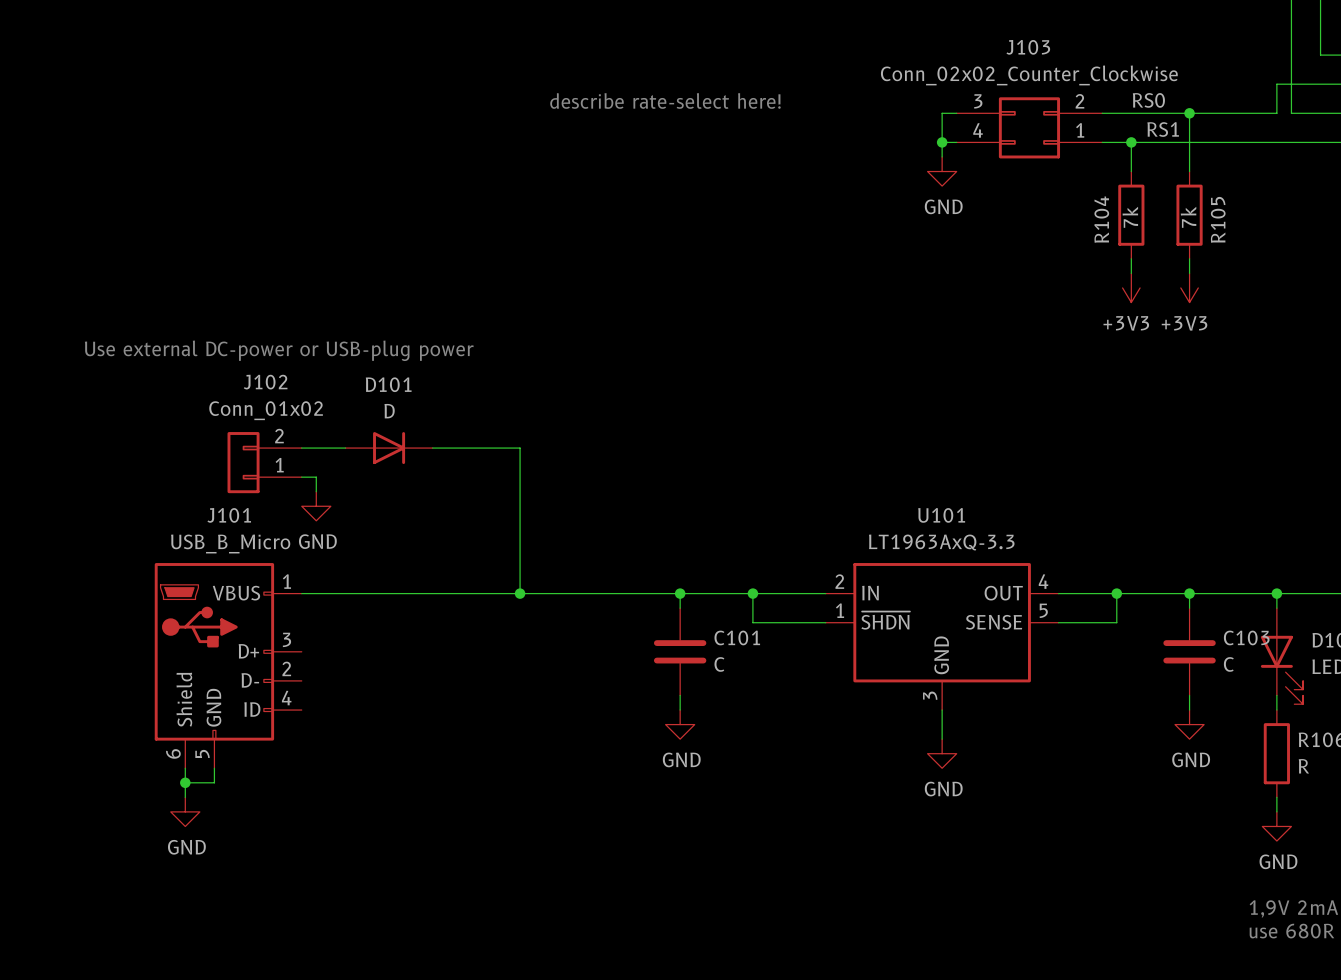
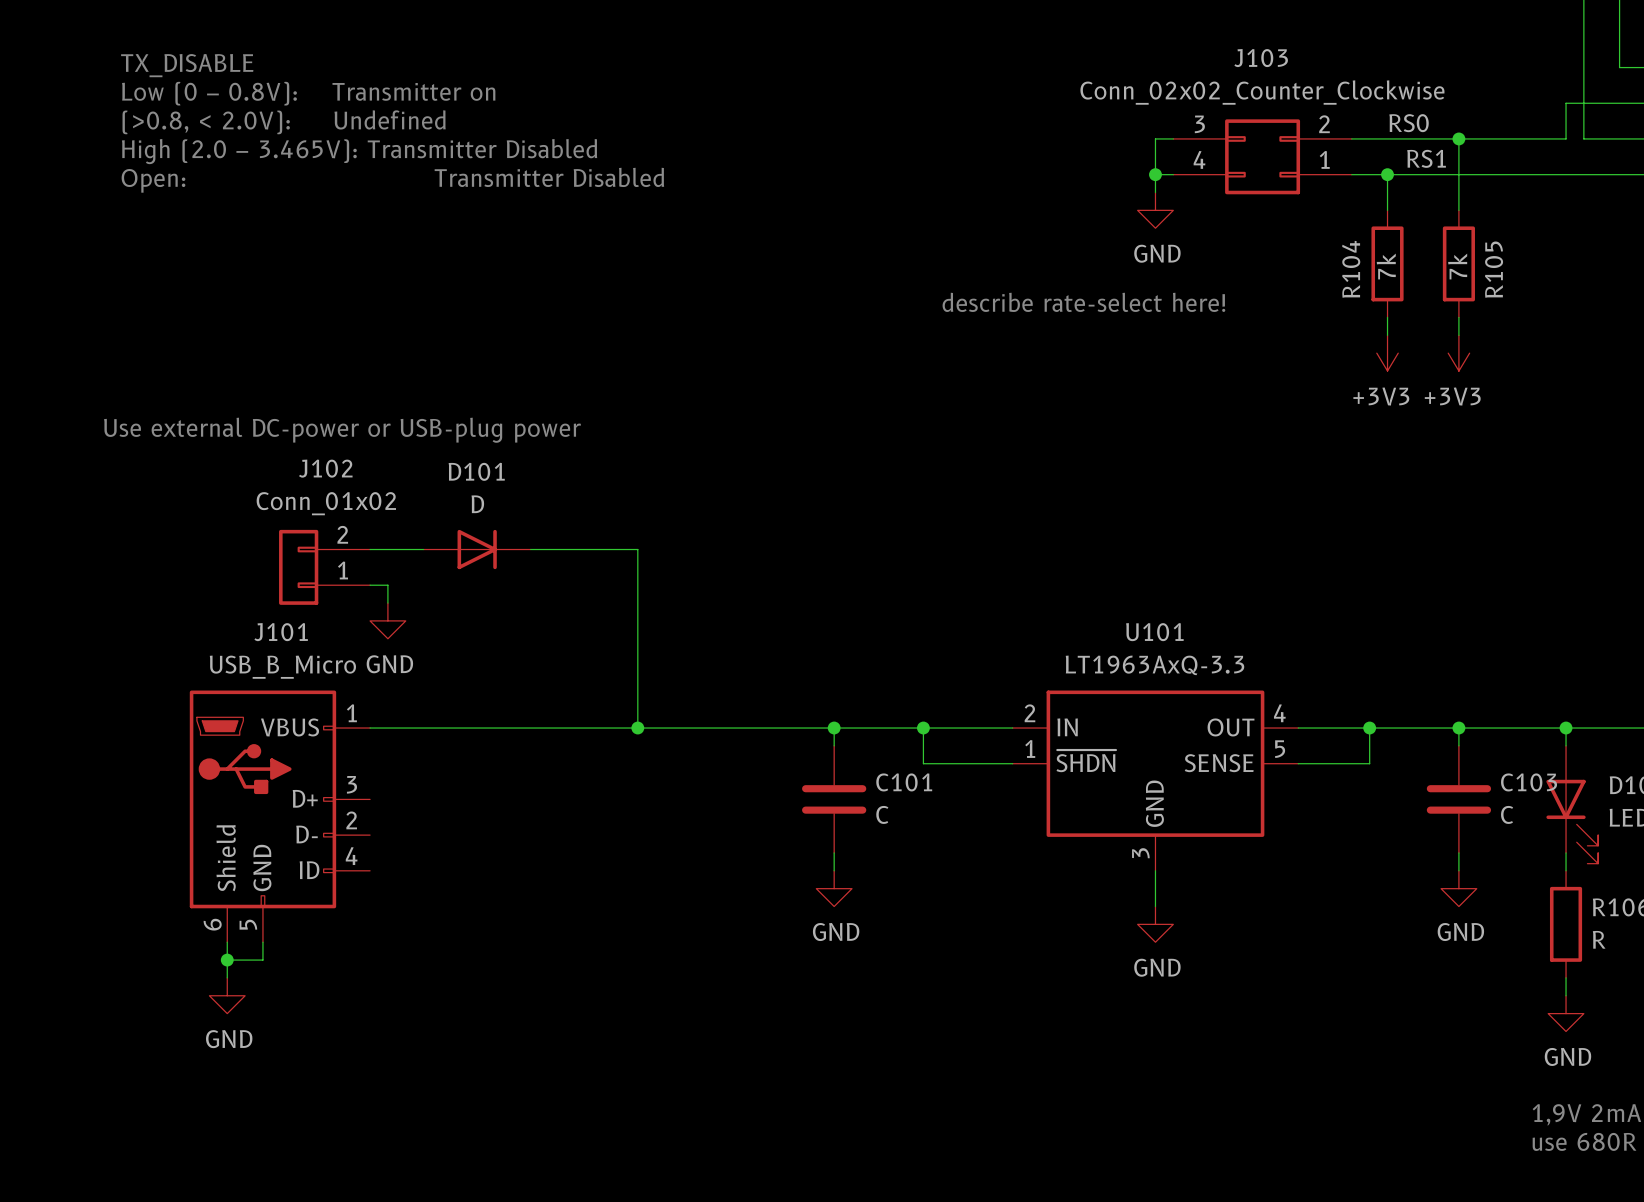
text: none -> TX_DISABLE (187, 65)
text: none -> Low (0 – 0.8V): Transmitter on (308, 93)
text: none -> (>0.8, < 2.0V): Undefined (284, 122)
text position: describe rate-select here! (665, 100) -> describe rate-select here! (1083, 302)
text: none -> High (2.0 – 3.465V): Transmitter Disabled (359, 151)
text: none -> Open: Transmitter Disabled (392, 180)

